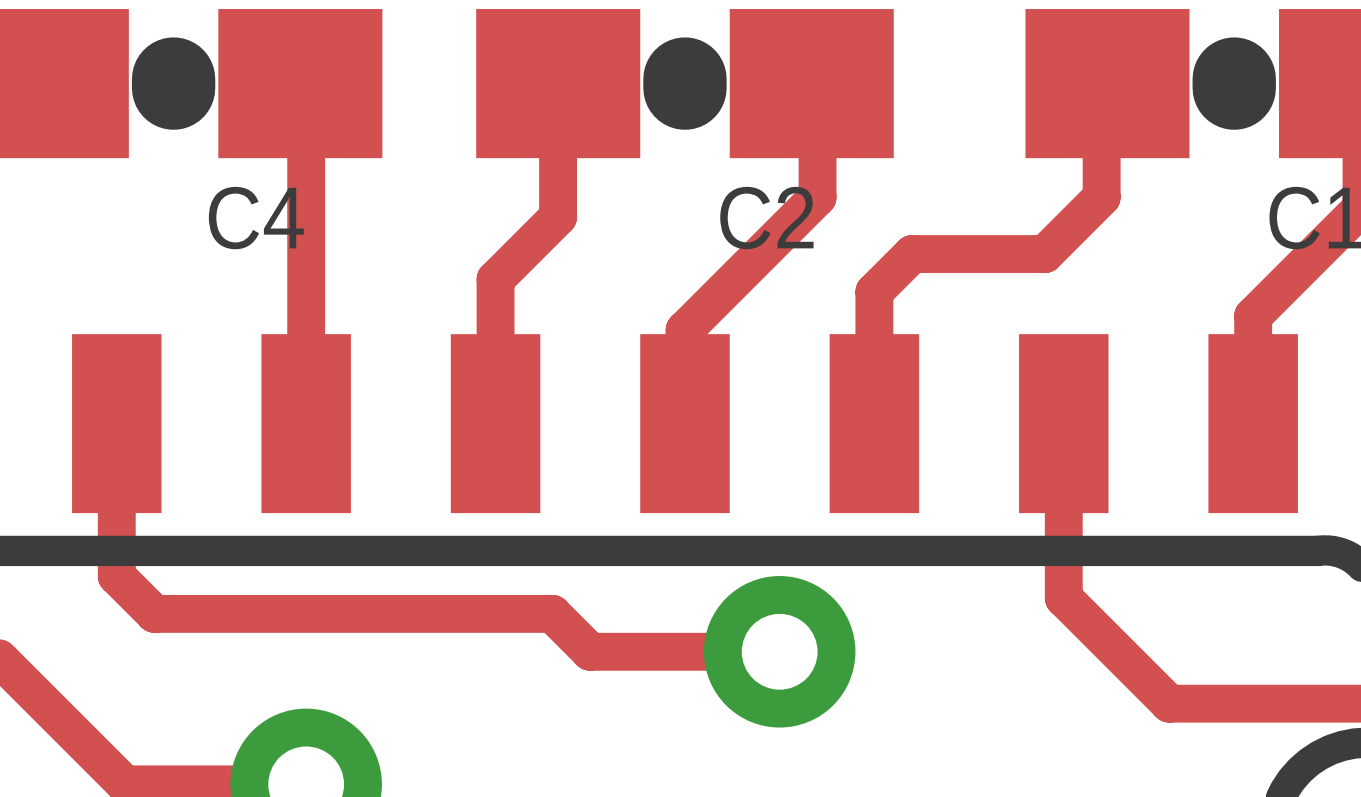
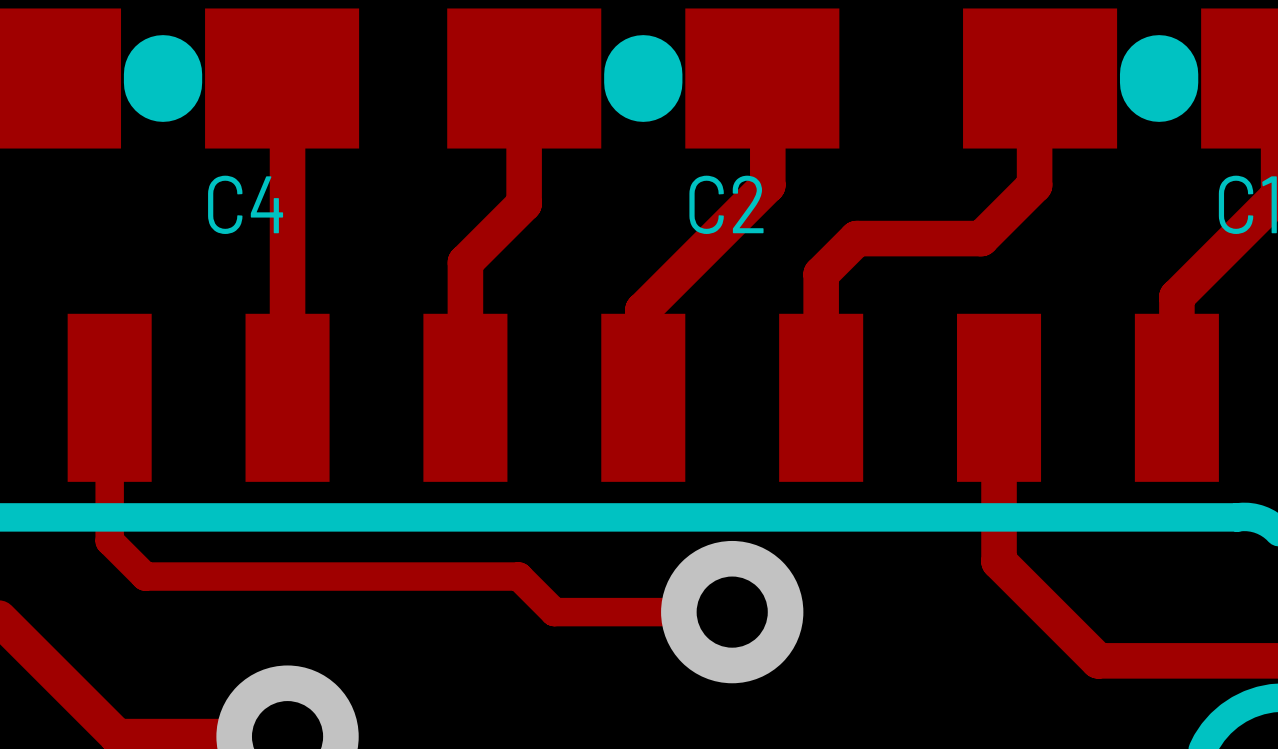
track width: thick (116, 423) (116, 576) (154, 613) (552, 613) (590, 651) (779, 651) -> thin (109, 397) (109, 540) (145, 576) (518, 576) (554, 612) (732, 612)

